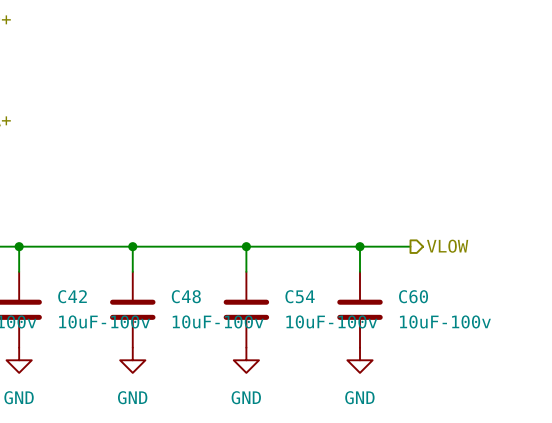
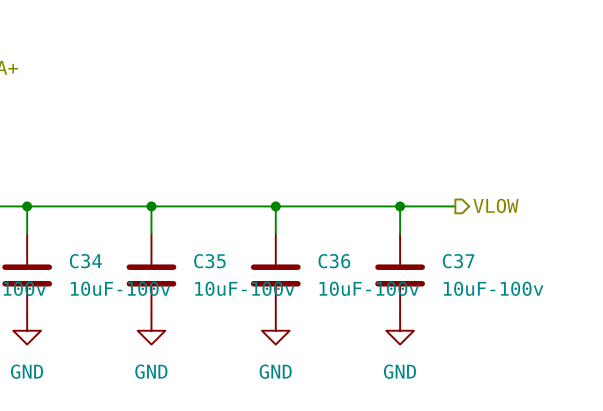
C42 name: C42 (72, 296) -> C34 (85, 261)
C48 name: C48 (186, 296) -> C35 (209, 261)
C54 name: C54 (300, 296) -> C36 (334, 261)
C60 name: C60 (413, 296) -> C37 (458, 261)

